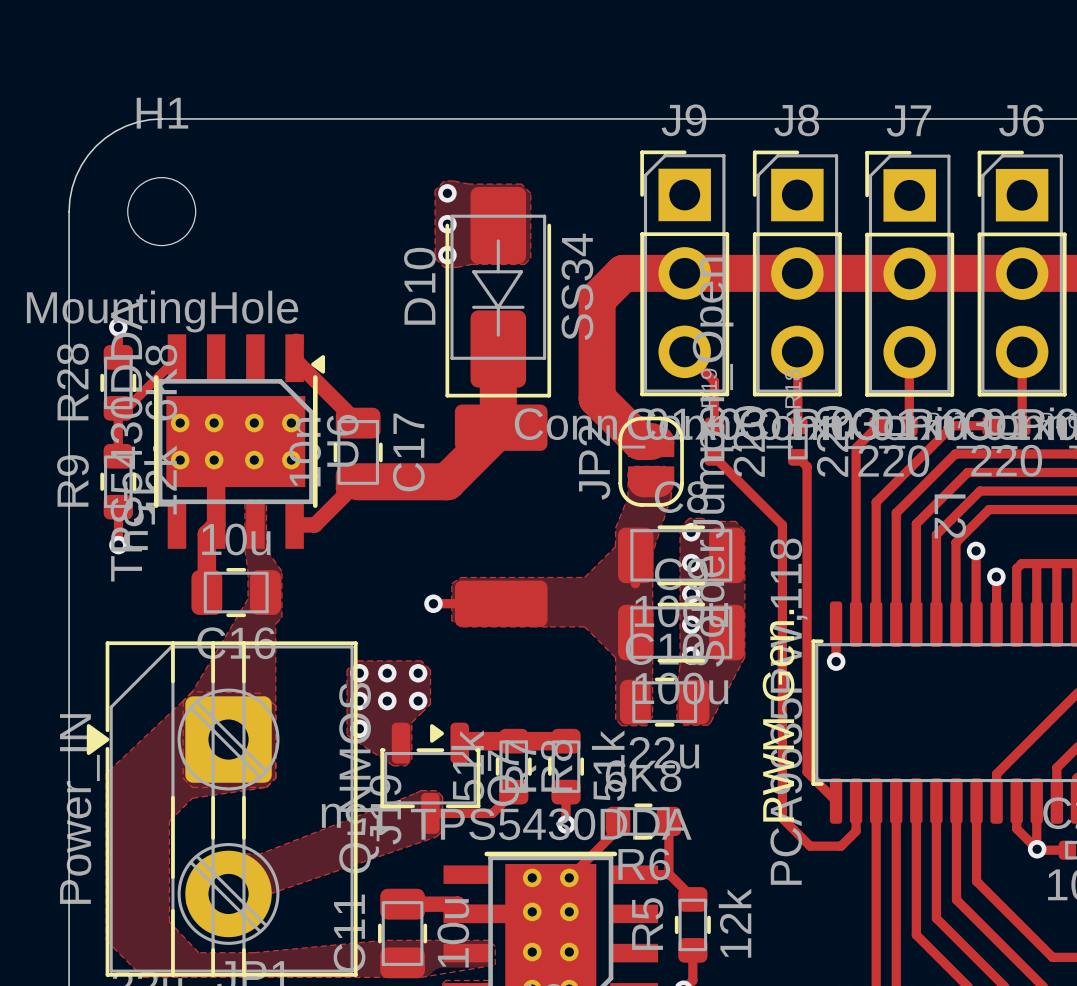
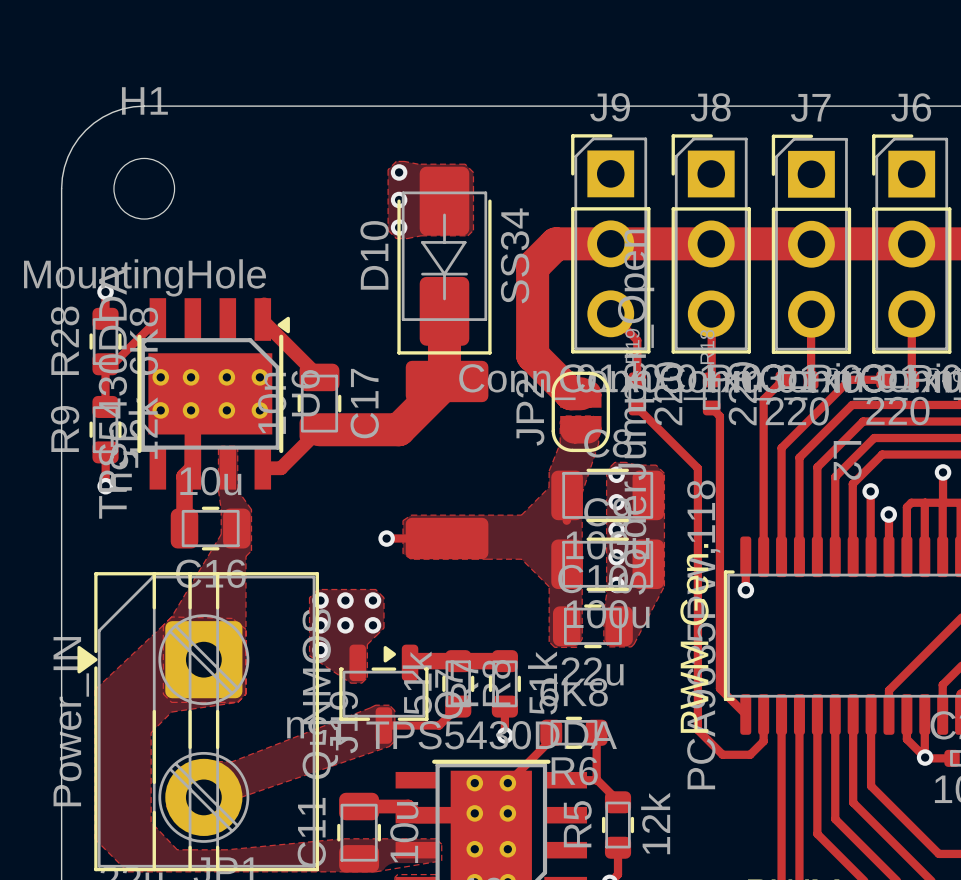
track: none -> (943, 472) (943, 502)
via: none -> (943, 472)

